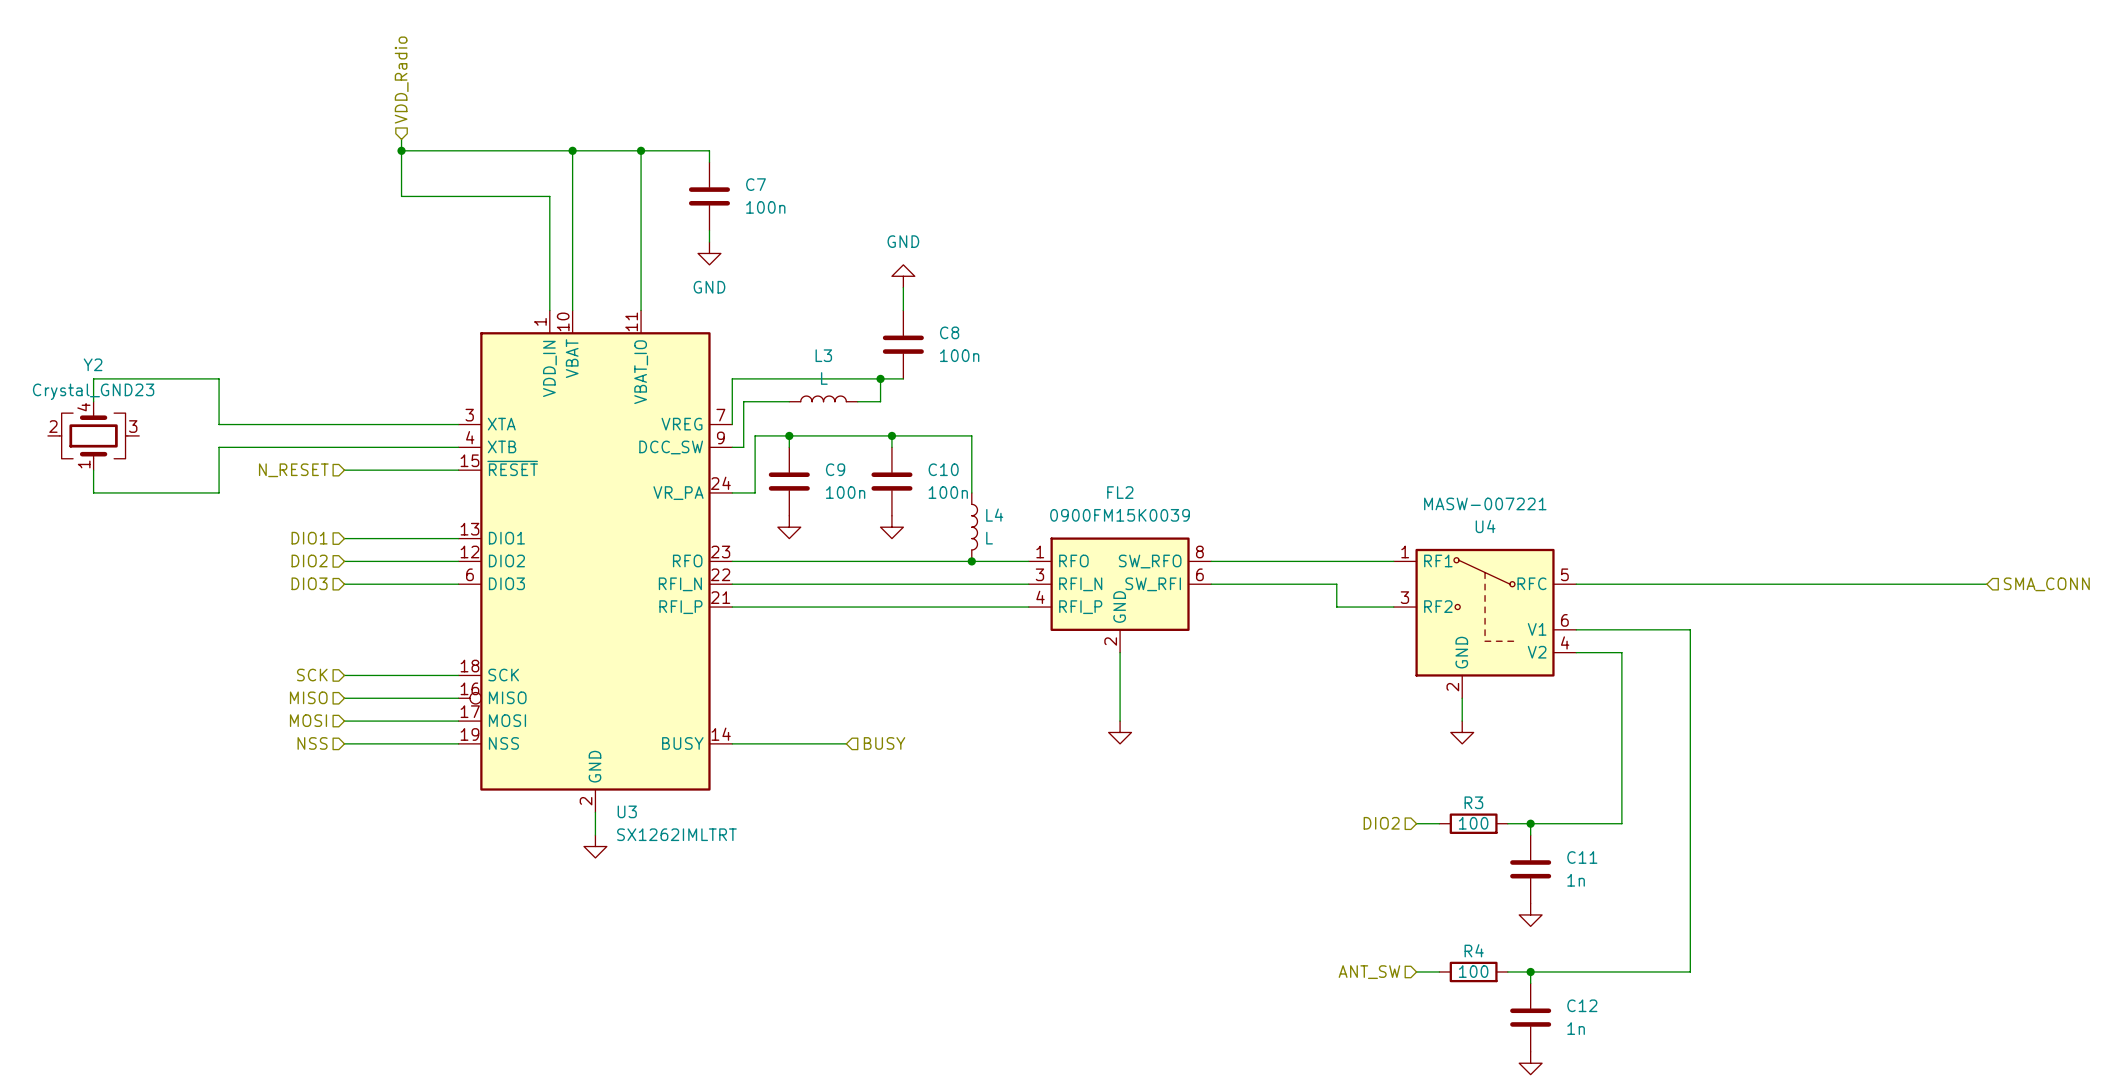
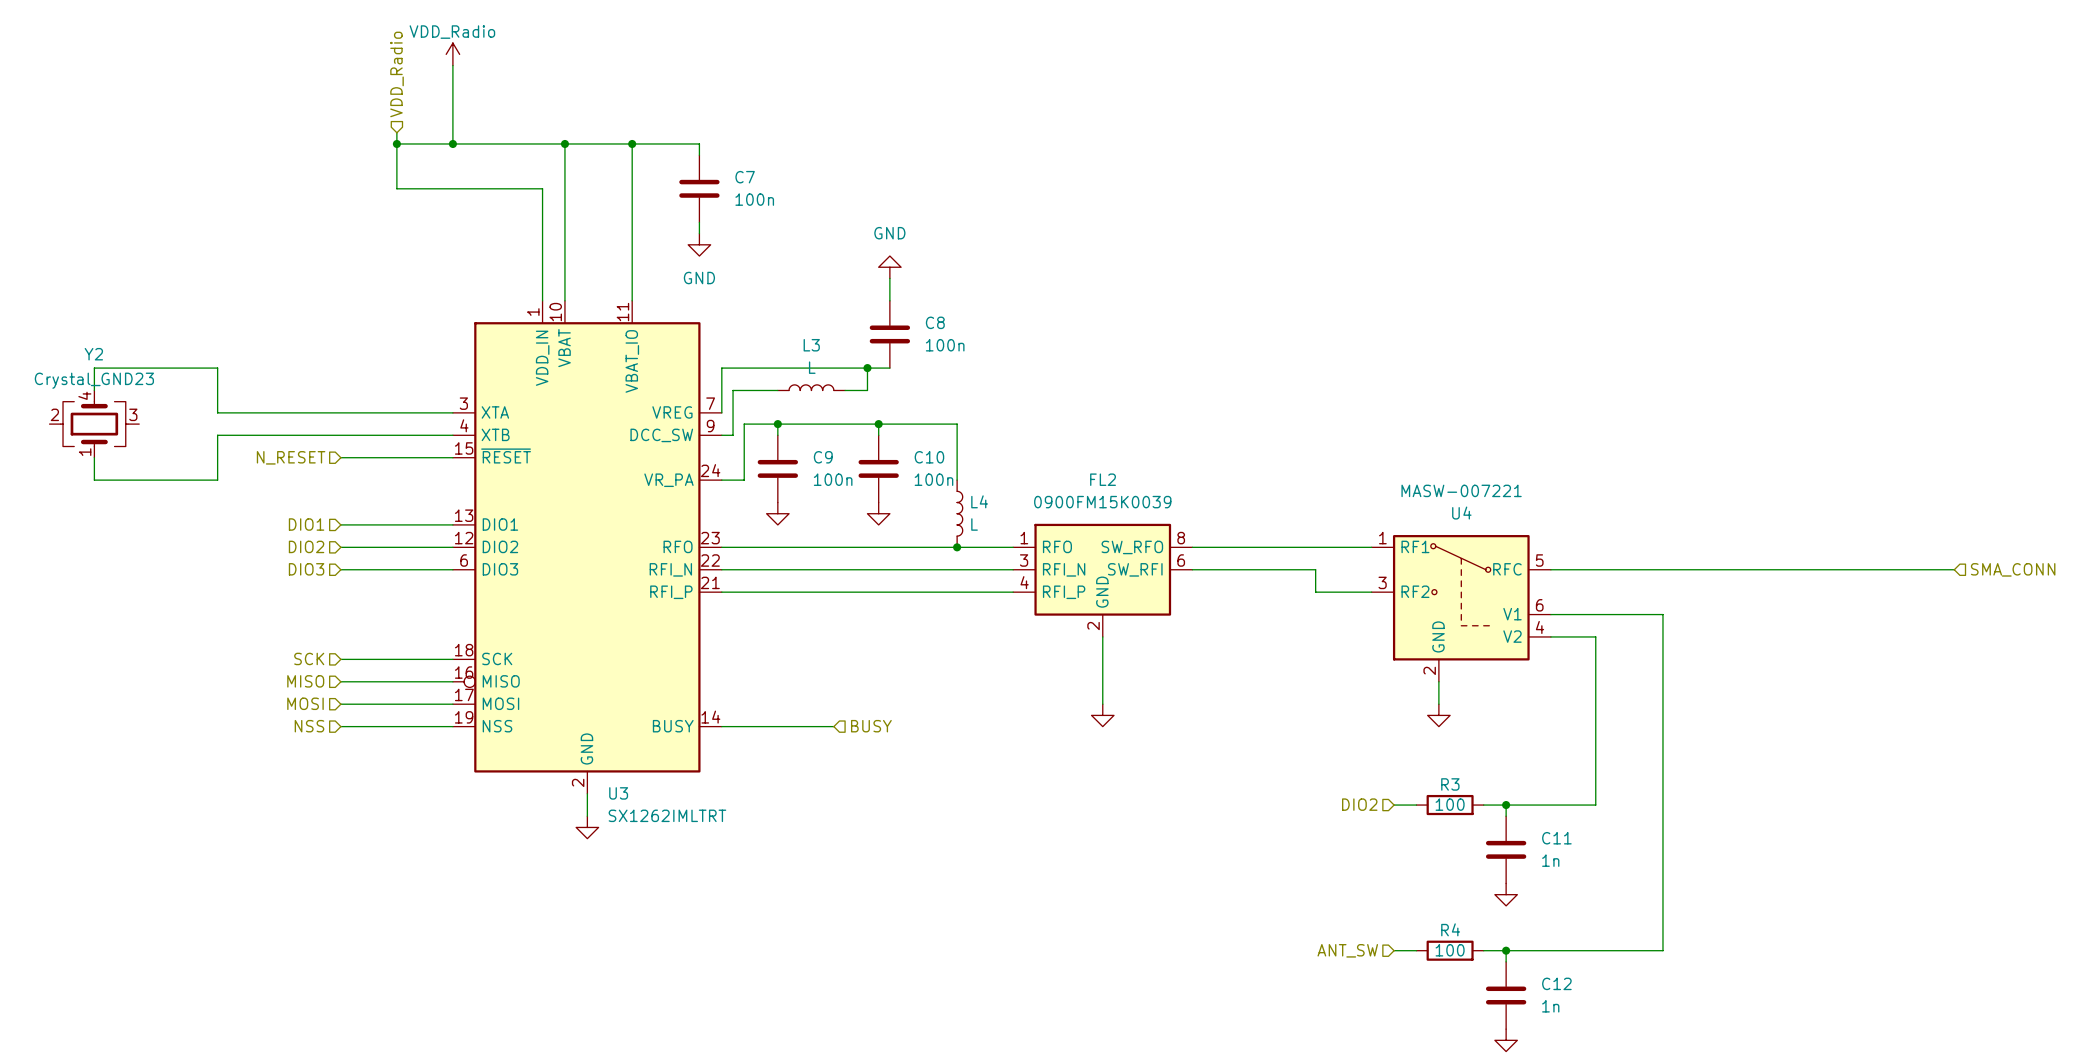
power symbol: none -> VDD_Radio (452, 54)
wire: none -> (452, 65) (452, 143)
junction: none -> (452, 143)

